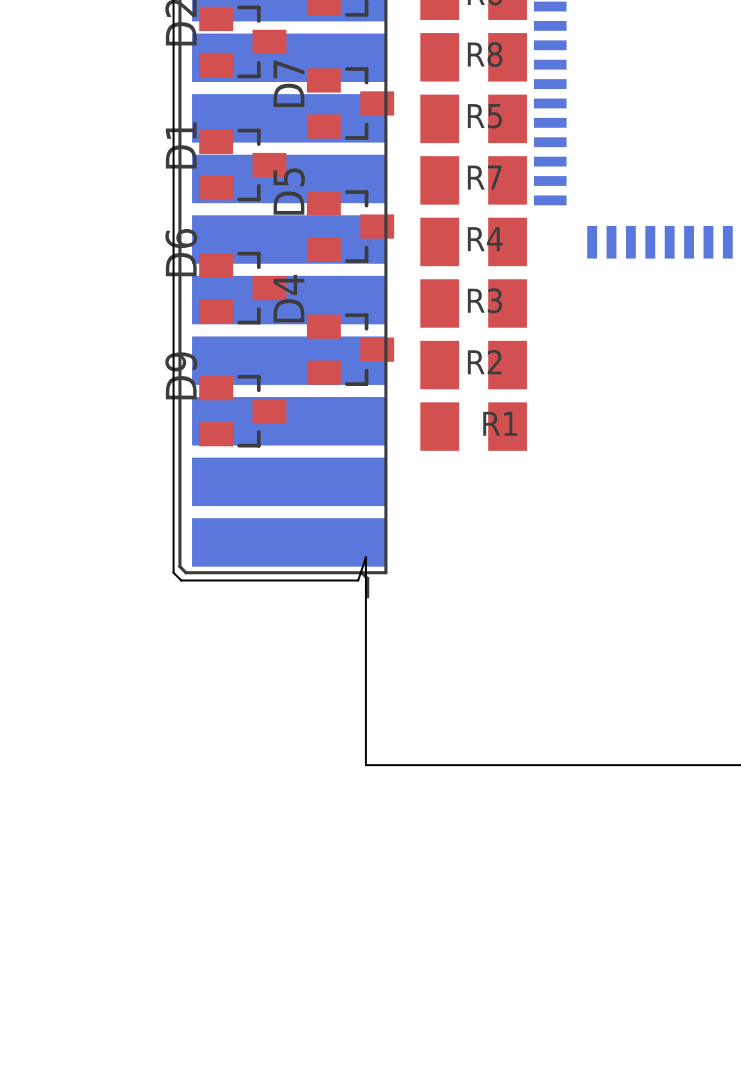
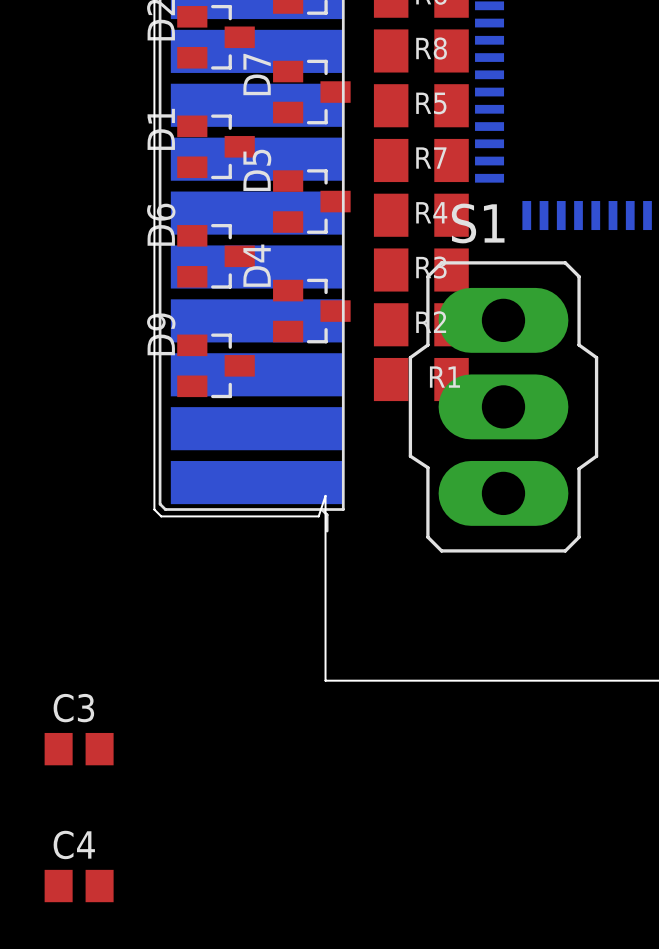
S1: none -> (503, 406)
C3: none -> (79, 749)
C4: none -> (79, 886)

